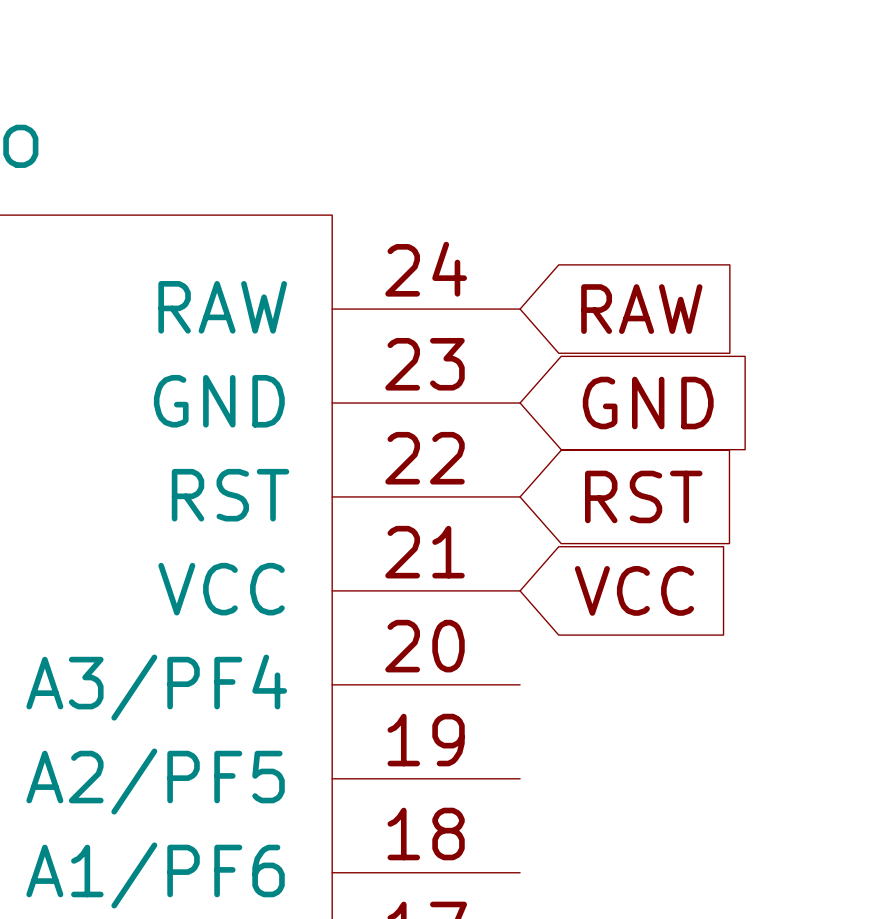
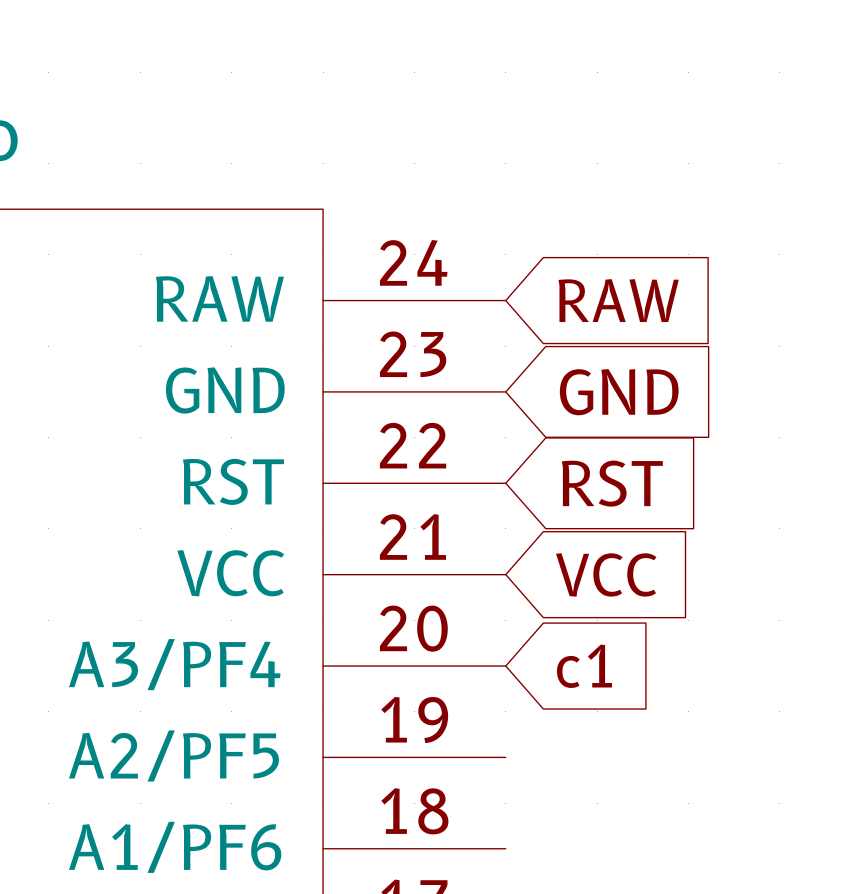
global label: none -> c1 (584, 666)

